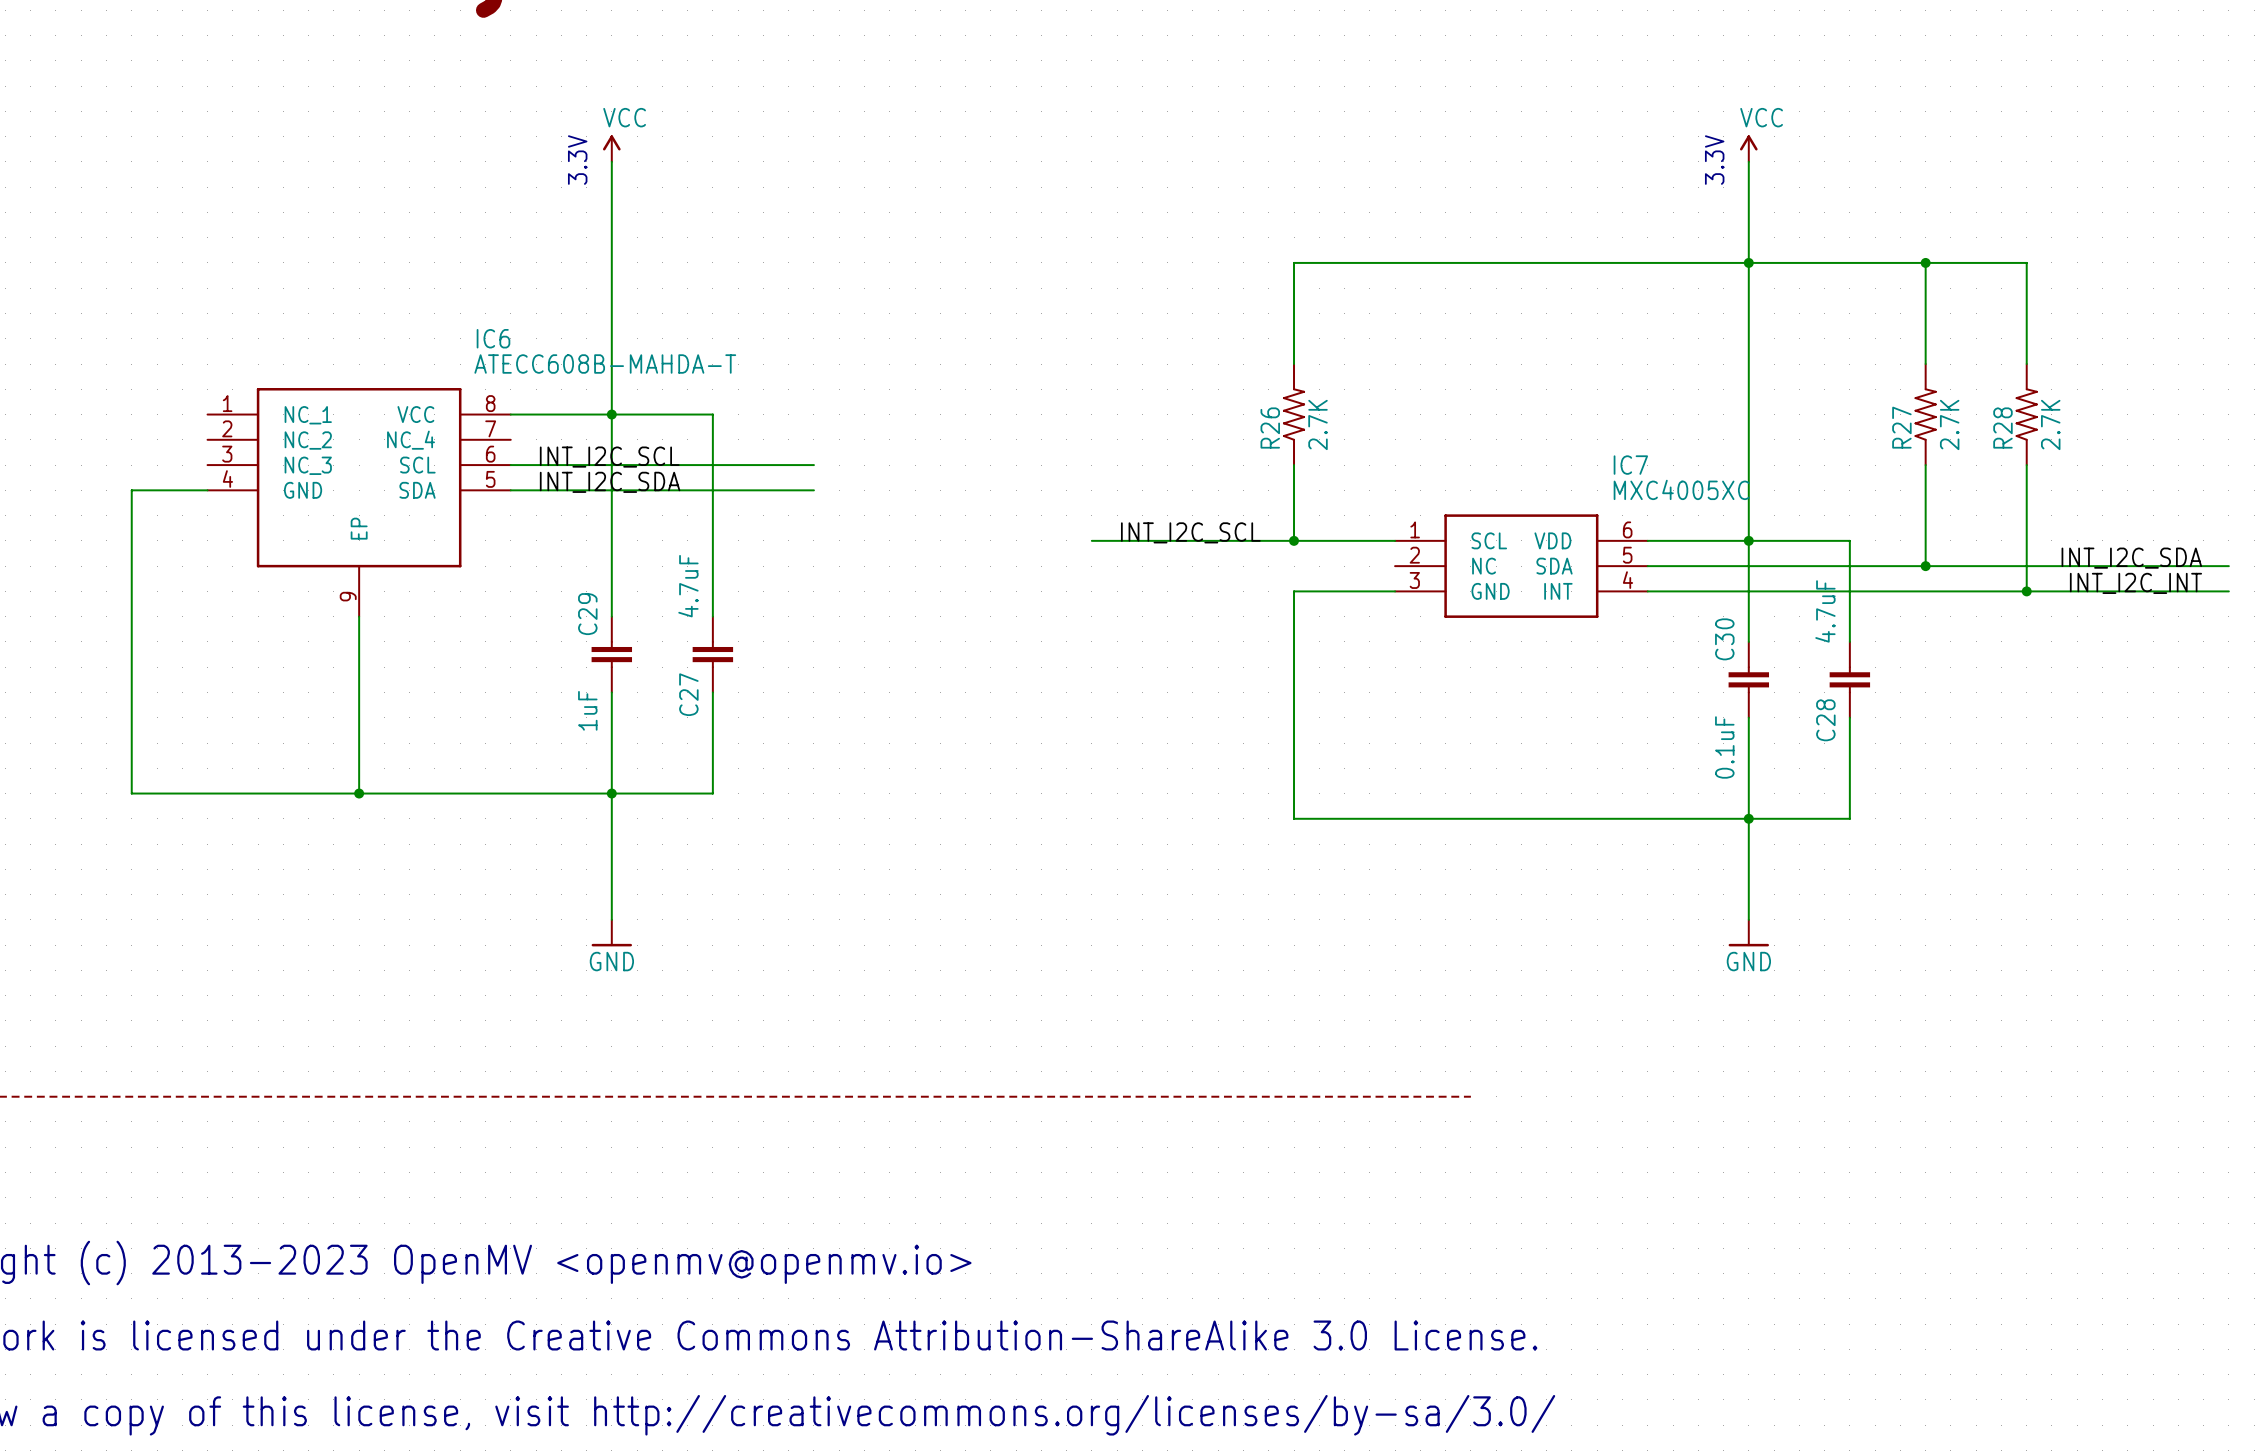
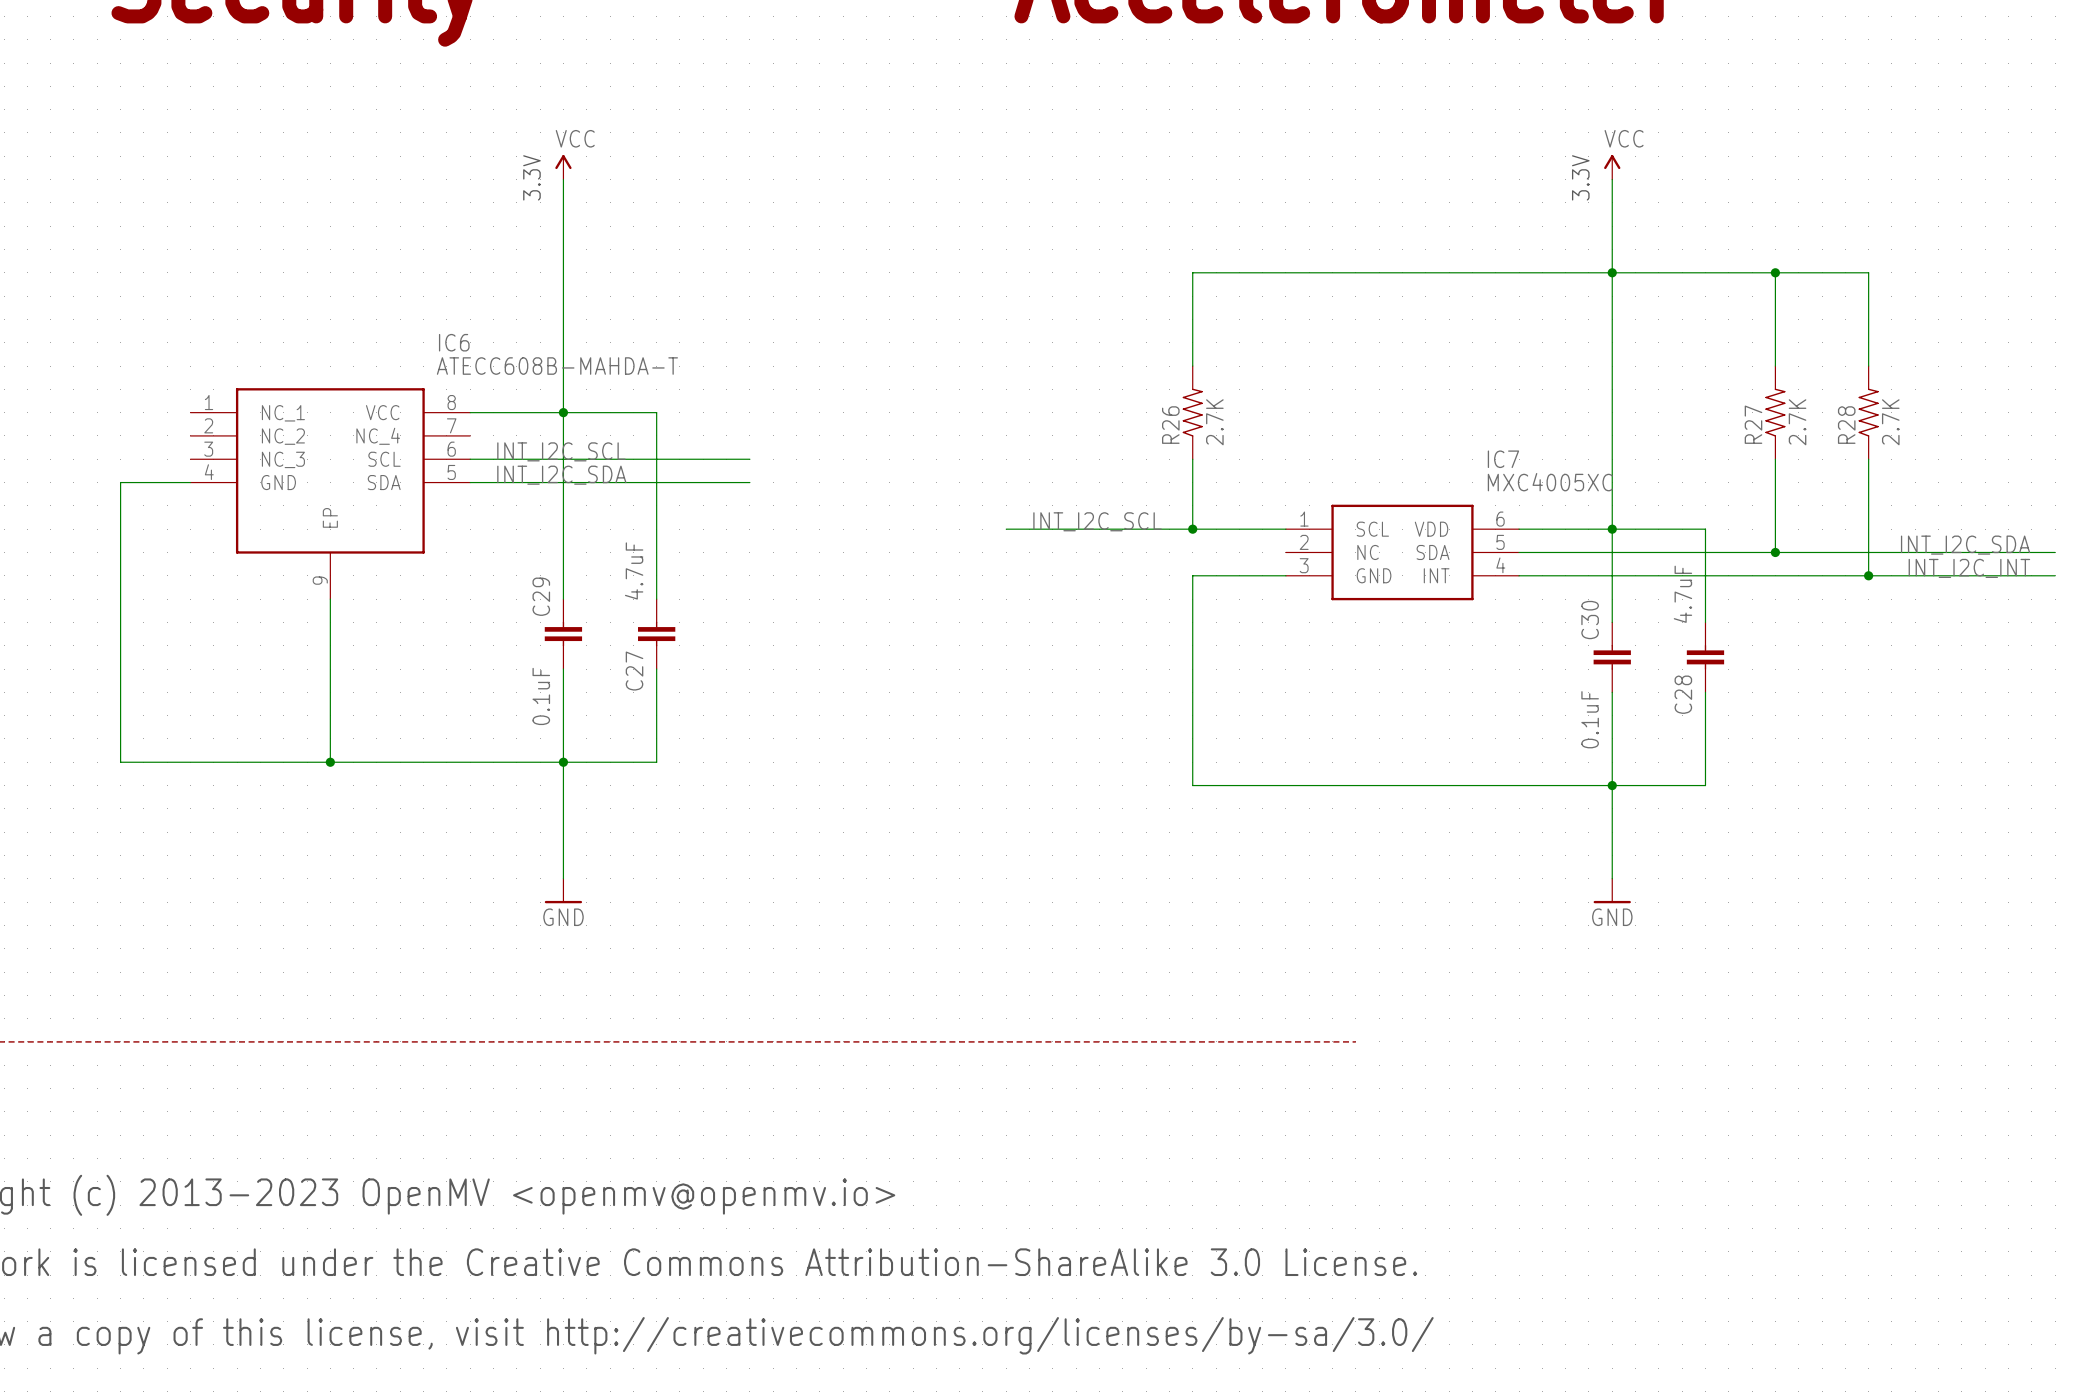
C29 value: 1uF (587, 710) -> 0.1uF (541, 696)

